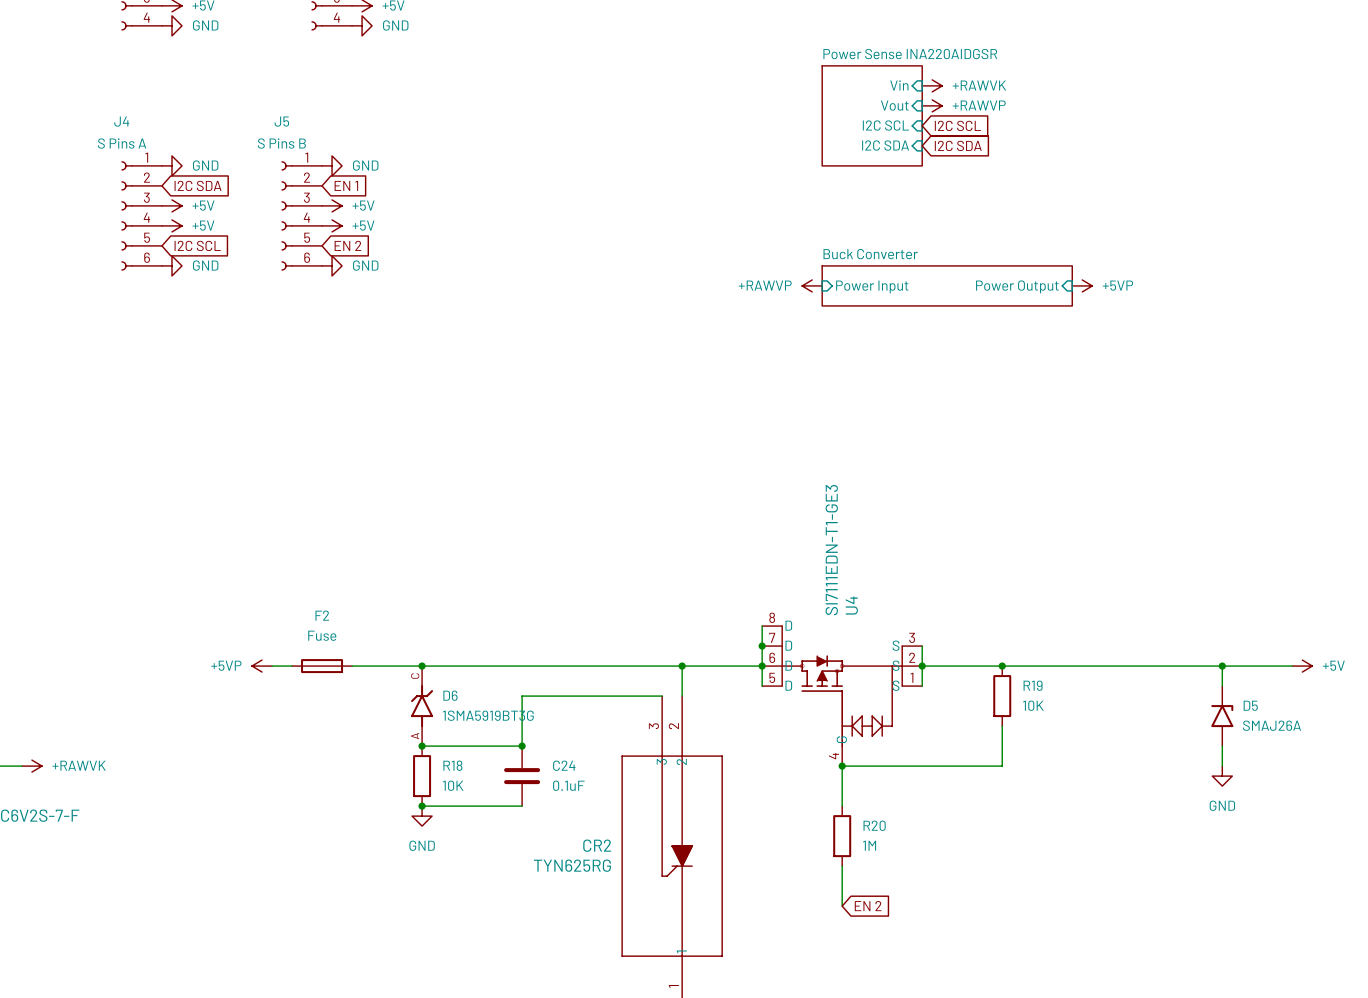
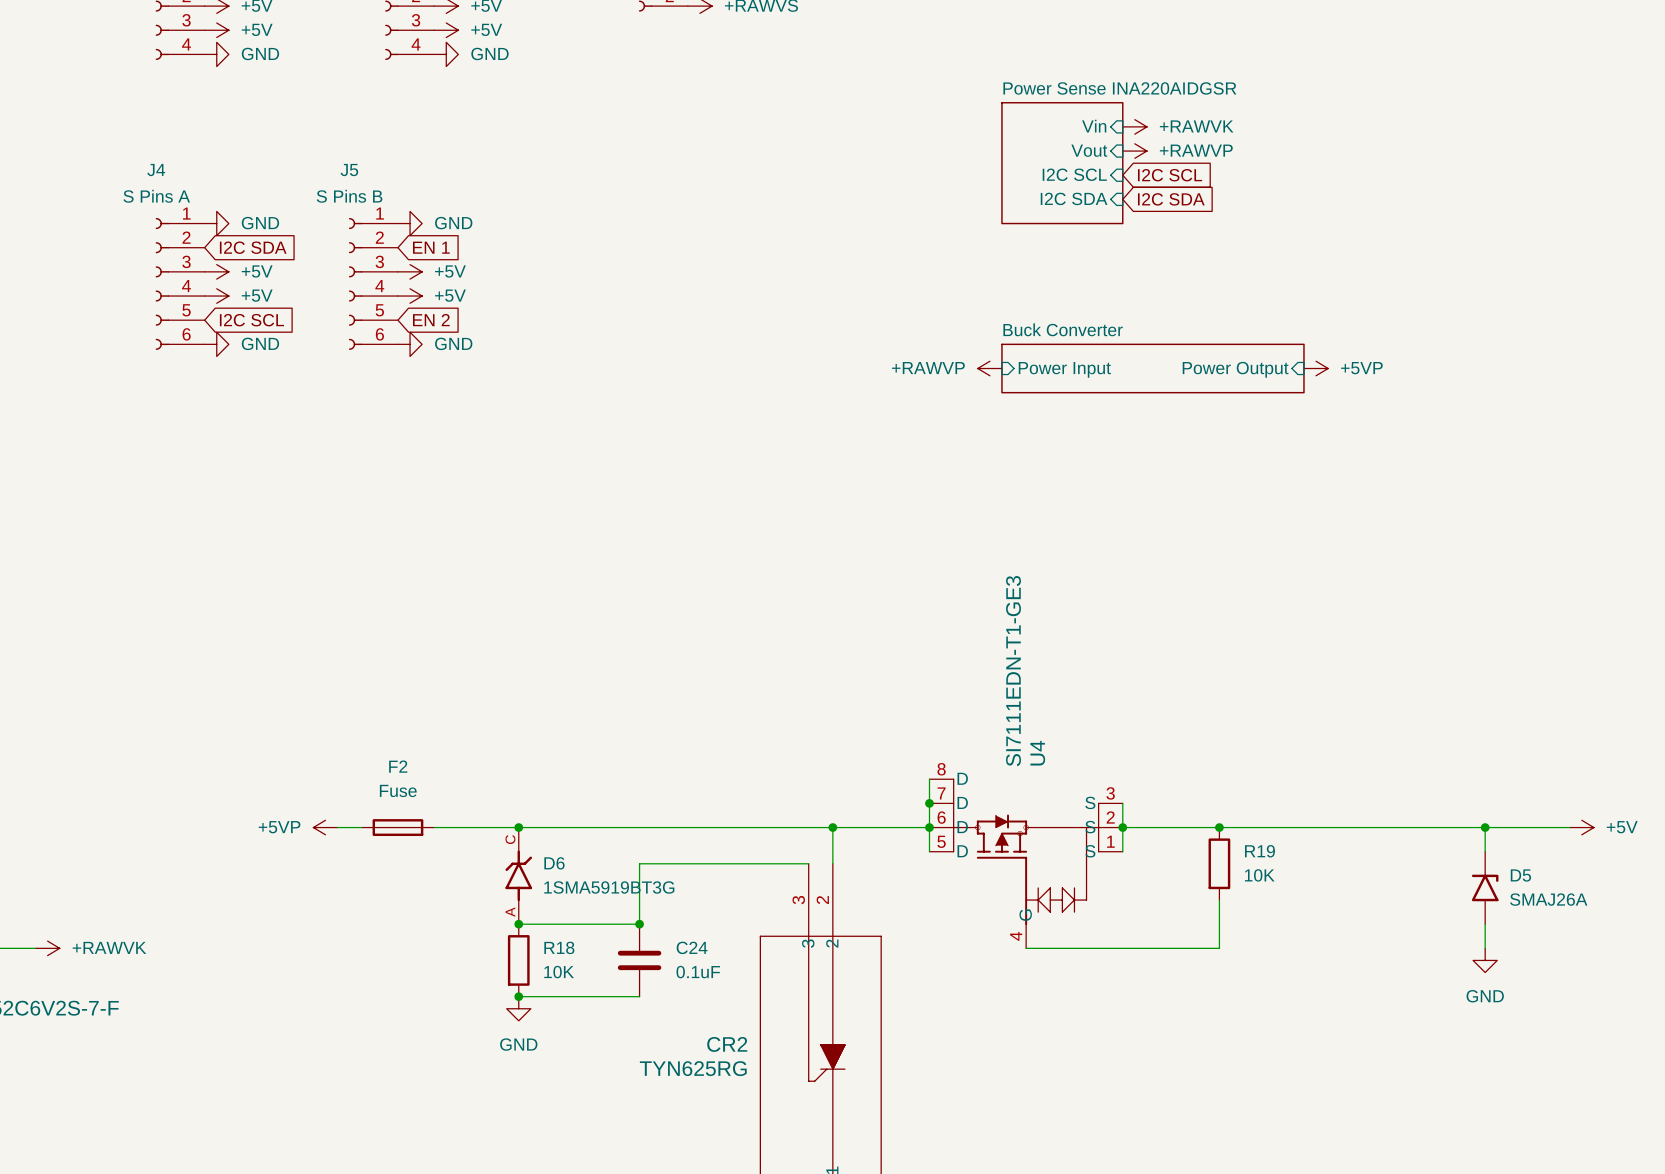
wire: (842, 766) (842, 806) -> none
junction: (842, 766) -> none
R20: 1M (842, 836) -> none
wire: (842, 866) (842, 906) -> none
global label: EN 2 (868, 906) -> none

